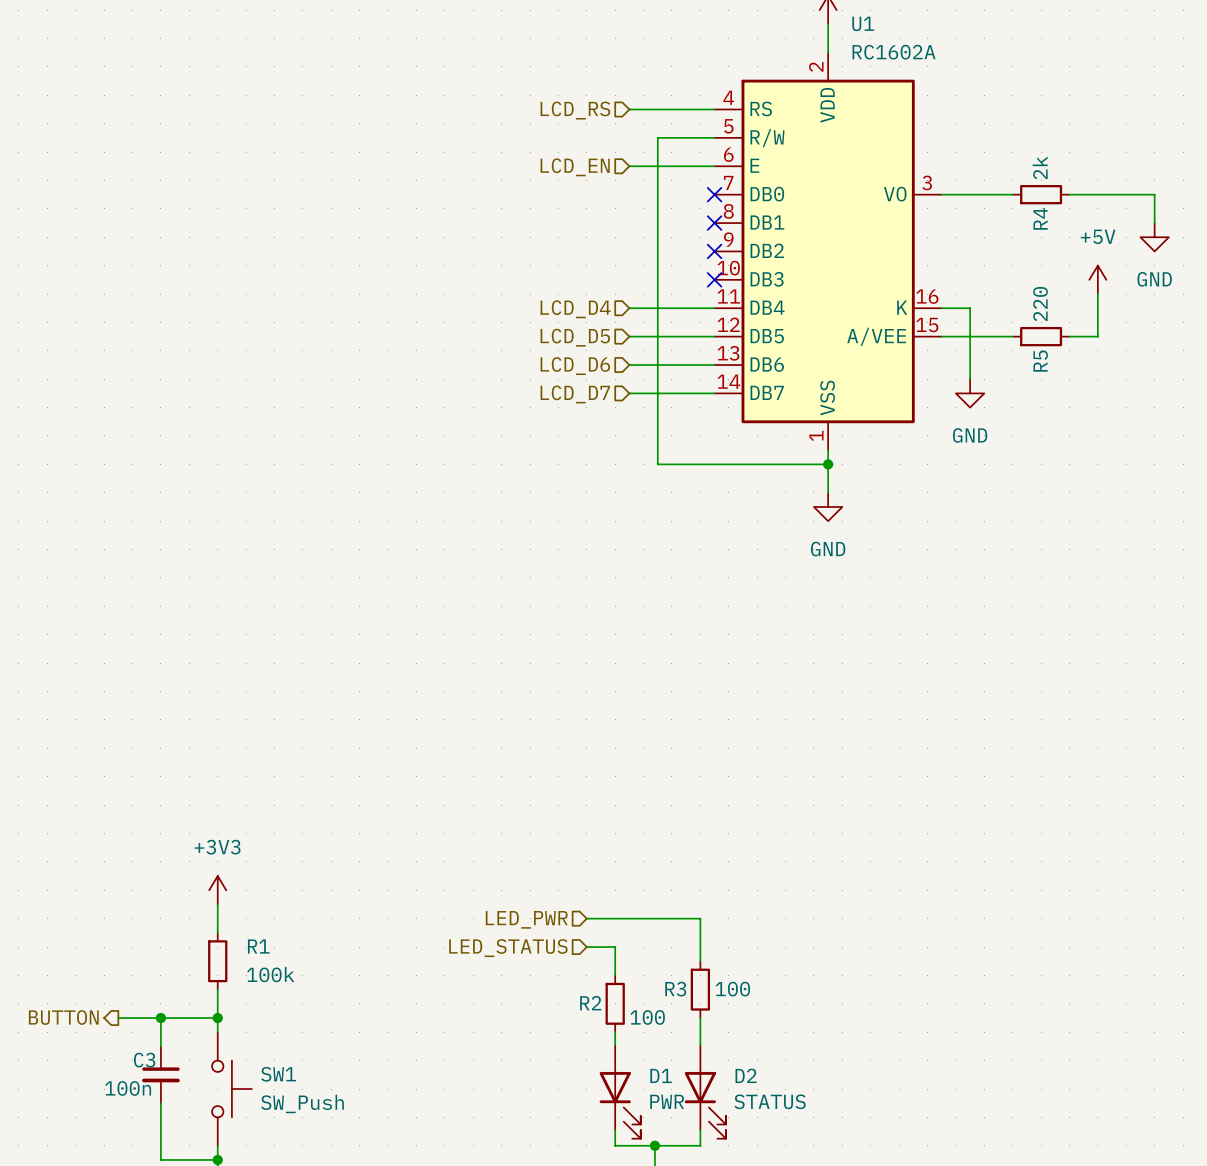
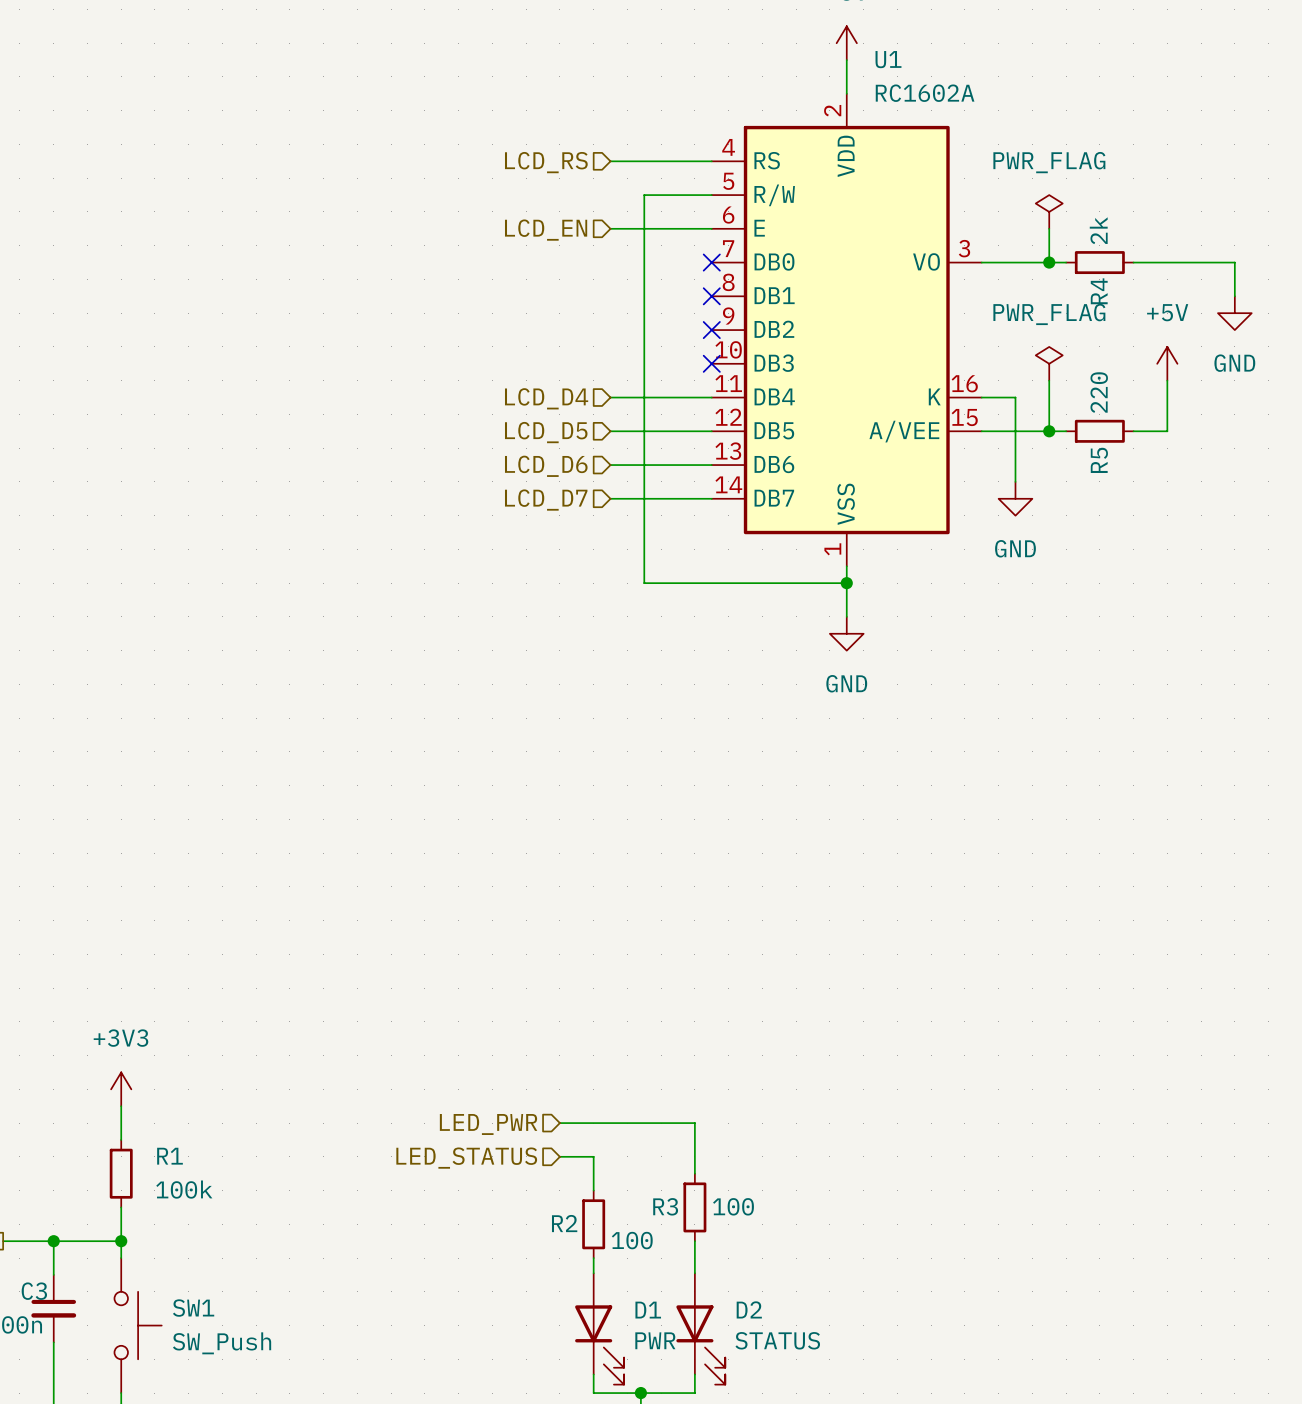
power symbol: none -> PWR_FLAG (1049, 211)
wire: none -> (1049, 228) (1049, 262)
junction: none -> (1049, 262)
power symbol: none -> PWR_FLAG (1049, 363)
wire: none -> (1049, 380) (1049, 431)
junction: none -> (1049, 431)

